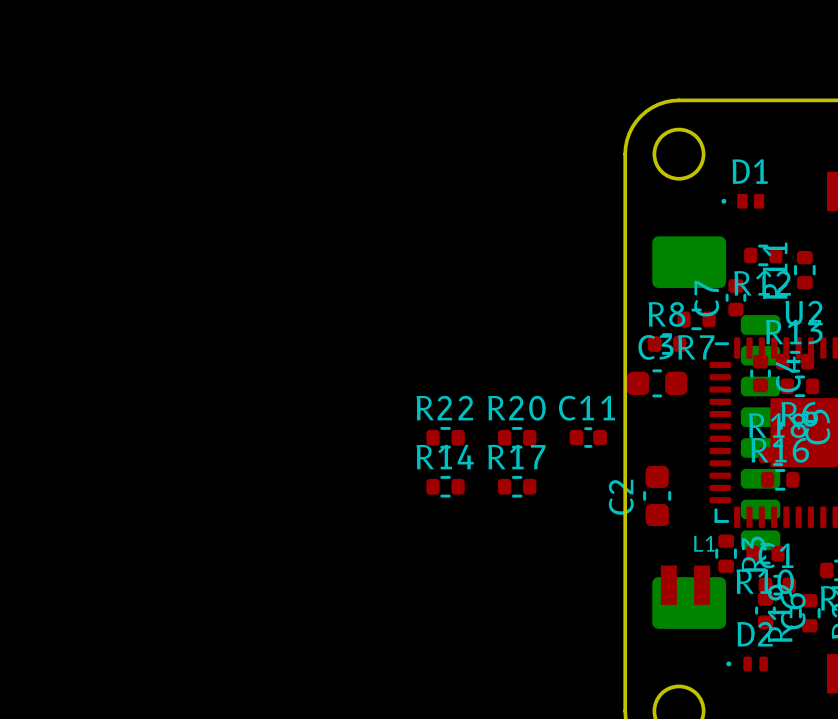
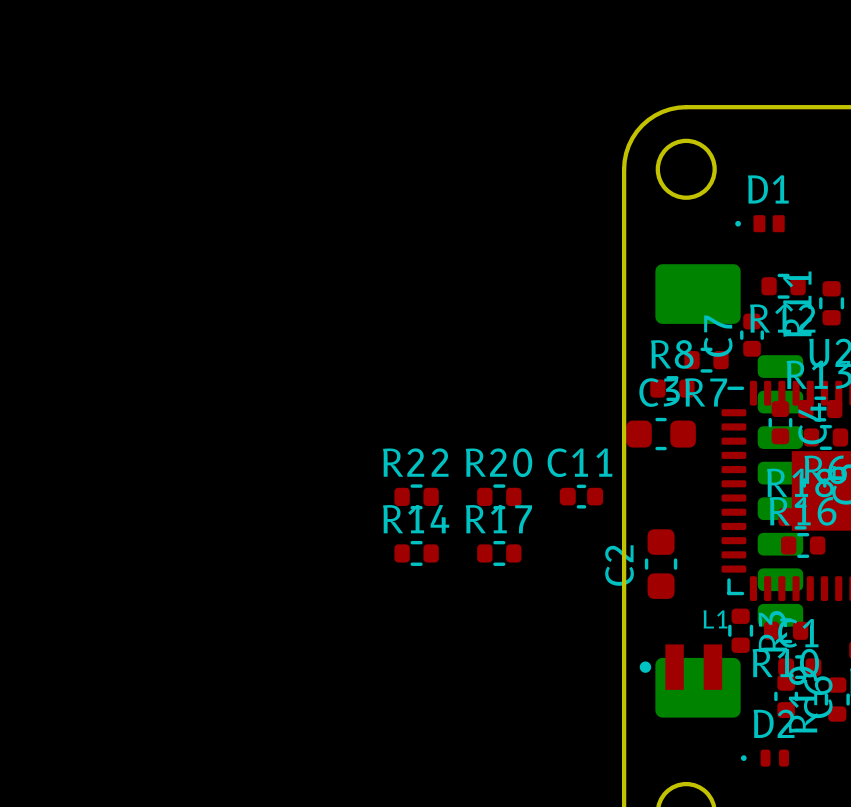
L1 footprint: [660, 565, 711, 605] -> [639, 644, 723, 690]

